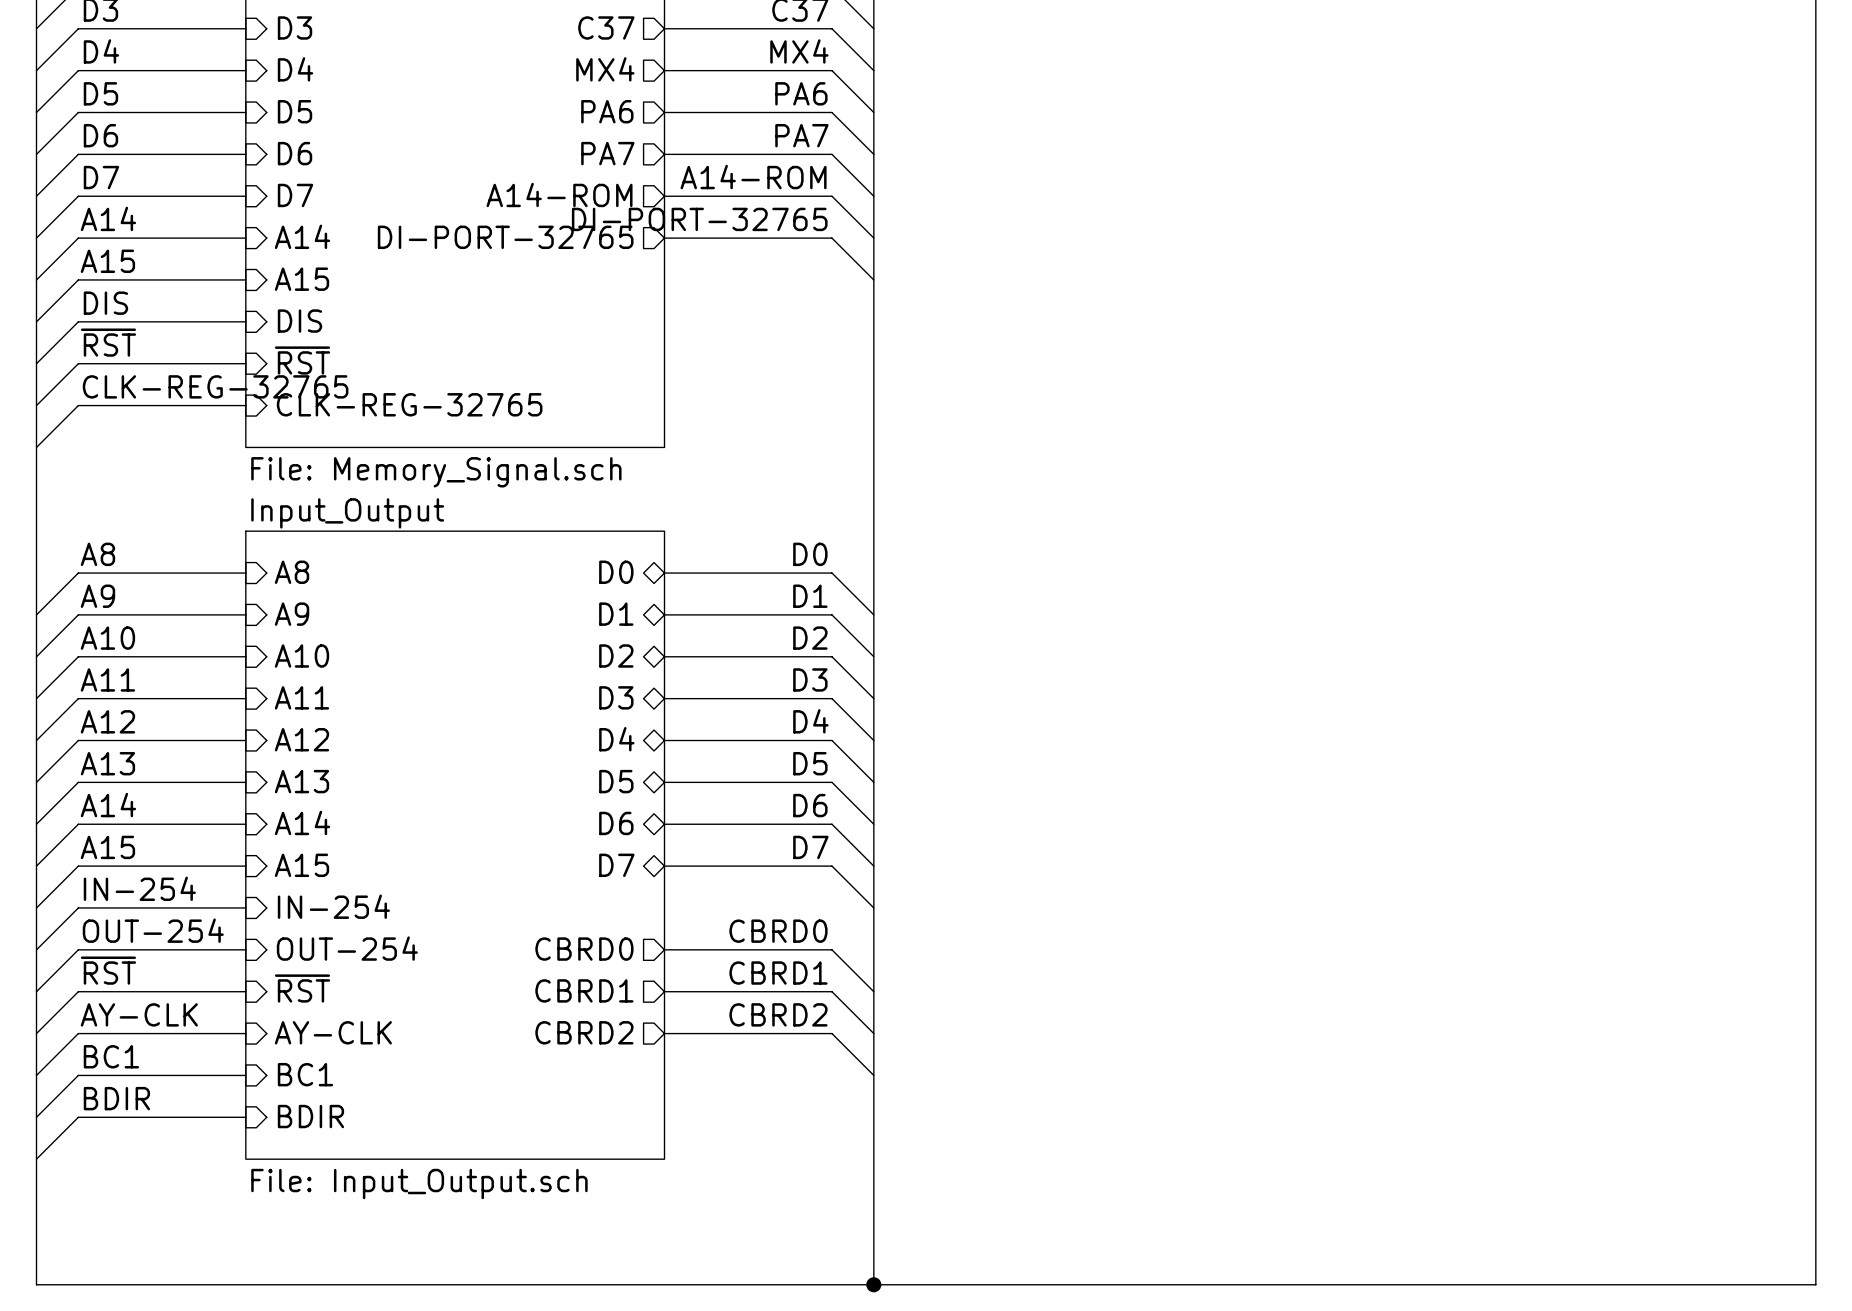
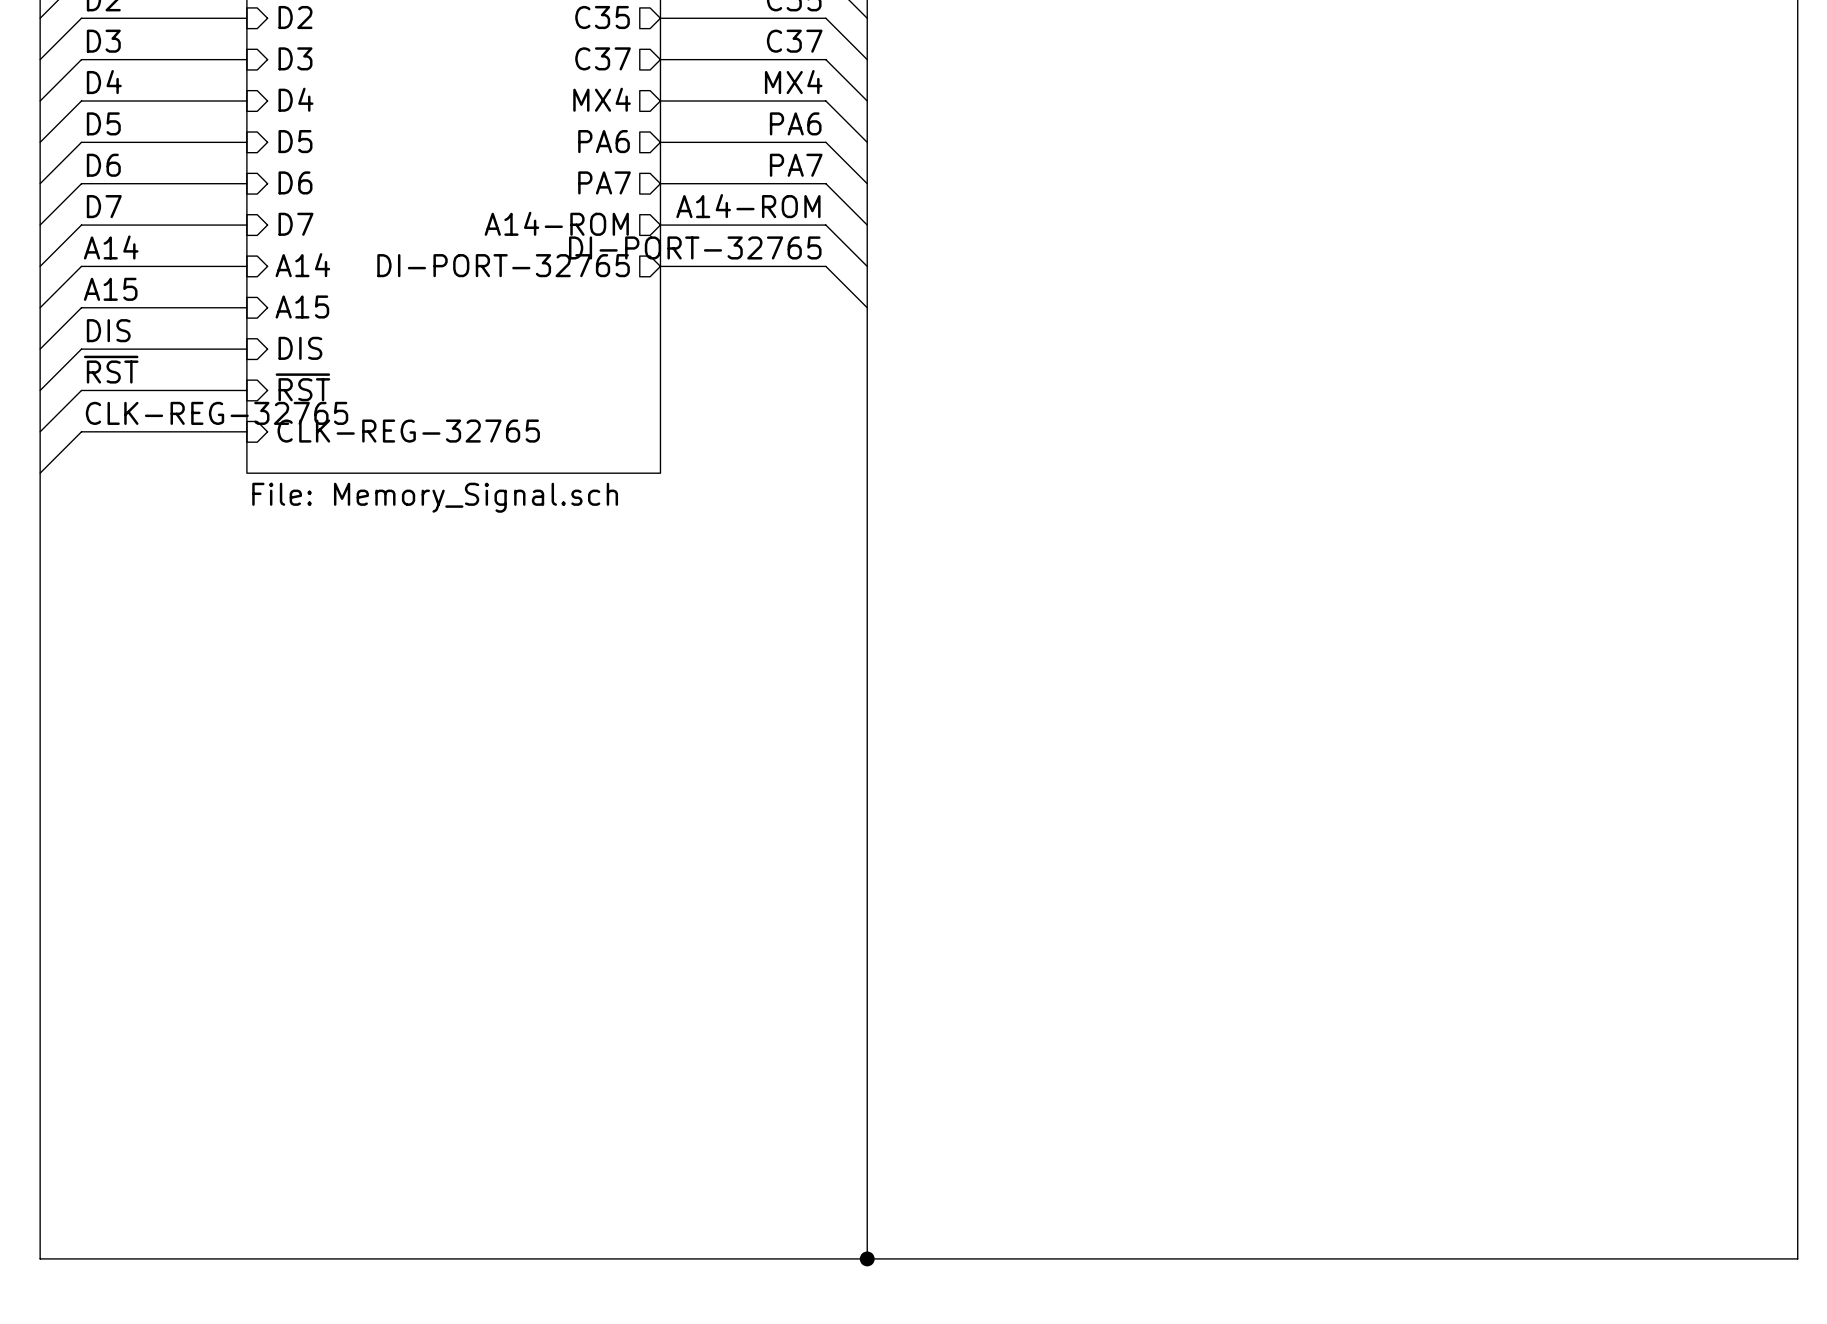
label: A8 (97, 554) -> none
label: D0 (810, 554) -> none
sheet pin: A8 (292, 572) -> none
sheet pin: D0 (616, 572) -> none
wire: (245, 573) (78, 573) (36, 614) -> none
wire: (664, 573) (831, 573) (873, 614) -> none
label: A9 (97, 596) -> none
label: D1 (810, 596) -> none
wire: (245, 614) (78, 614) (36, 656) -> none
sheet pin: A9 (292, 614) -> none
sheet pin: D1 (616, 614) -> none
wire: (664, 614) (831, 614) (873, 656) -> none
label: A10 (107, 638) -> none
label: D2 (810, 638) -> none
sheet pin: A10 (301, 655) -> none
sheet pin: D2 (616, 655) -> none
wire: (245, 656) (78, 656) (36, 698) -> none
wire: (664, 656) (831, 656) (873, 698) -> none
label: A11 (107, 679) -> none
label: D3 (810, 679) -> none
sheet pin: A11 (301, 697) -> none
sheet pin: D3 (616, 697) -> none
wire: (245, 698) (78, 698) (36, 740) -> none
wire: (664, 698) (831, 698) (873, 740) -> none
label: A12 (107, 721) -> none
label: D4 (810, 721) -> none
sheet pin: A12 (301, 739) -> none
sheet pin: D4 (616, 739) -> none
wire: (245, 740) (78, 740) (36, 782) -> none
wire: (664, 740) (831, 740) (873, 782) -> none
label: A13 (107, 763) -> none
label: D5 (810, 763) -> none
sheet pin: A13 (301, 781) -> none
sheet pin: D5 (616, 781) -> none
wire: (245, 782) (78, 782) (36, 824) -> none
wire: (664, 782) (831, 782) (873, 824) -> none
label: A14 (108, 805) -> none
label: D6 (810, 805) -> none
sheet pin: A14 (302, 822) -> none
sheet pin: D6 (616, 823) -> none
wire: (245, 824) (78, 824) (36, 866) -> none
wire: (664, 824) (831, 824) (873, 866) -> none
sheet Input_Output: File: Input_Output.sch (455, 845) -> none
label: A15 (107, 847) -> none
label: D7 (810, 847) -> none
sheet pin: A15 (301, 865) -> none
sheet pin: D7 (616, 865) -> none
wire: (245, 866) (78, 866) (36, 907) -> none
wire: (664, 866) (831, 866) (873, 907) -> none
label: IN-254 (139, 888) -> none
sheet pin: IN-254 (333, 906) -> none
wire: (245, 907) (78, 907) (36, 949) -> none
label: OUT-254 (153, 930) -> none
label: CBRD0 (778, 931) -> none
sheet pin: OUT-254 (347, 948) -> none
wire: (245, 949) (78, 949) (36, 991) -> none
sheet pin: CBRD0 (584, 949) -> none
wire: (664, 949) (831, 949) (873, 991) -> none
label: ~{RST} (108, 970) -> none
label: CBRD1 (778, 973) -> none
sheet pin: ~{RST} (302, 988) -> none
sheet pin: CBRD1 (584, 990) -> none
wire: (245, 991) (78, 991) (36, 1033) -> none
wire: (664, 991) (831, 991) (873, 1033) -> none
label: AY-CLK (139, 1014) -> none
label: CBRD2 (778, 1014) -> none
sheet pin: AY-CLK (333, 1032) -> none
sheet pin: CBRD2 (584, 1032) -> none
wire: (245, 1033) (78, 1033) (36, 1075) -> none
wire: (664, 1033) (831, 1033) (873, 1075) -> none
label: BC1 (111, 1056) -> none
sheet pin: BC1 (305, 1074) -> none
wire: (245, 1075) (78, 1075) (36, 1117) -> none
label: BDIR (116, 1098) -> none
sheet pin: BDIR (310, 1116) -> none
wire: (245, 1117) (78, 1117) (36, 1159) -> none
bus: (36, 1242) (36, 1284) (1815, 1284) (1815, 1242) -> (40, 1258) (1797, 1258)
bus: (873, 1242) (873, 1284) -> none
junction position: (873, 1284) -> (867, 1258)

